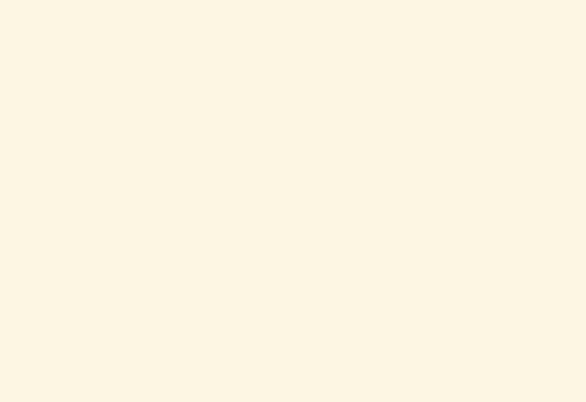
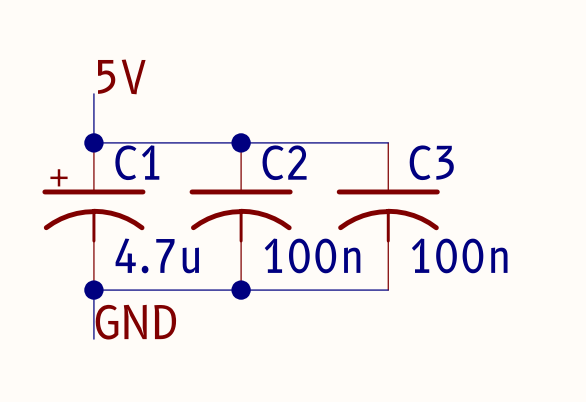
label: none -> 5V (121, 76)
wire: none -> (93, 93) (93, 142) (388, 142)
junction: none -> (93, 142)
junction: none -> (241, 142)
C1: none -> 4.7u (93, 216)
C2: none -> 100n (241, 216)
C3: none -> 100n (388, 216)
junction: none -> (93, 290)
junction: none -> (241, 290)
wire: none -> (388, 290) (93, 290) (93, 339)
label: none -> GND (135, 322)

